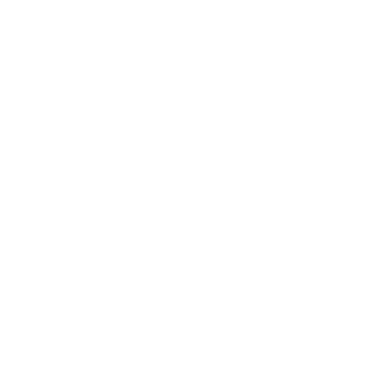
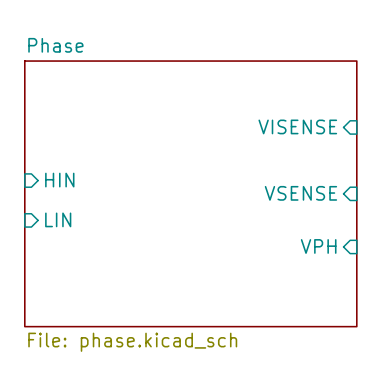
sheet pin: none -> VISENSE (297, 126)
sheet pin: none -> HIN (59, 180)
sheet Phase: none -> File: phase.kicad_sch (190, 193)
sheet pin: none -> VSENSE (300, 193)
sheet pin: none -> LIN (58, 219)
sheet pin: none -> VPH (318, 246)

